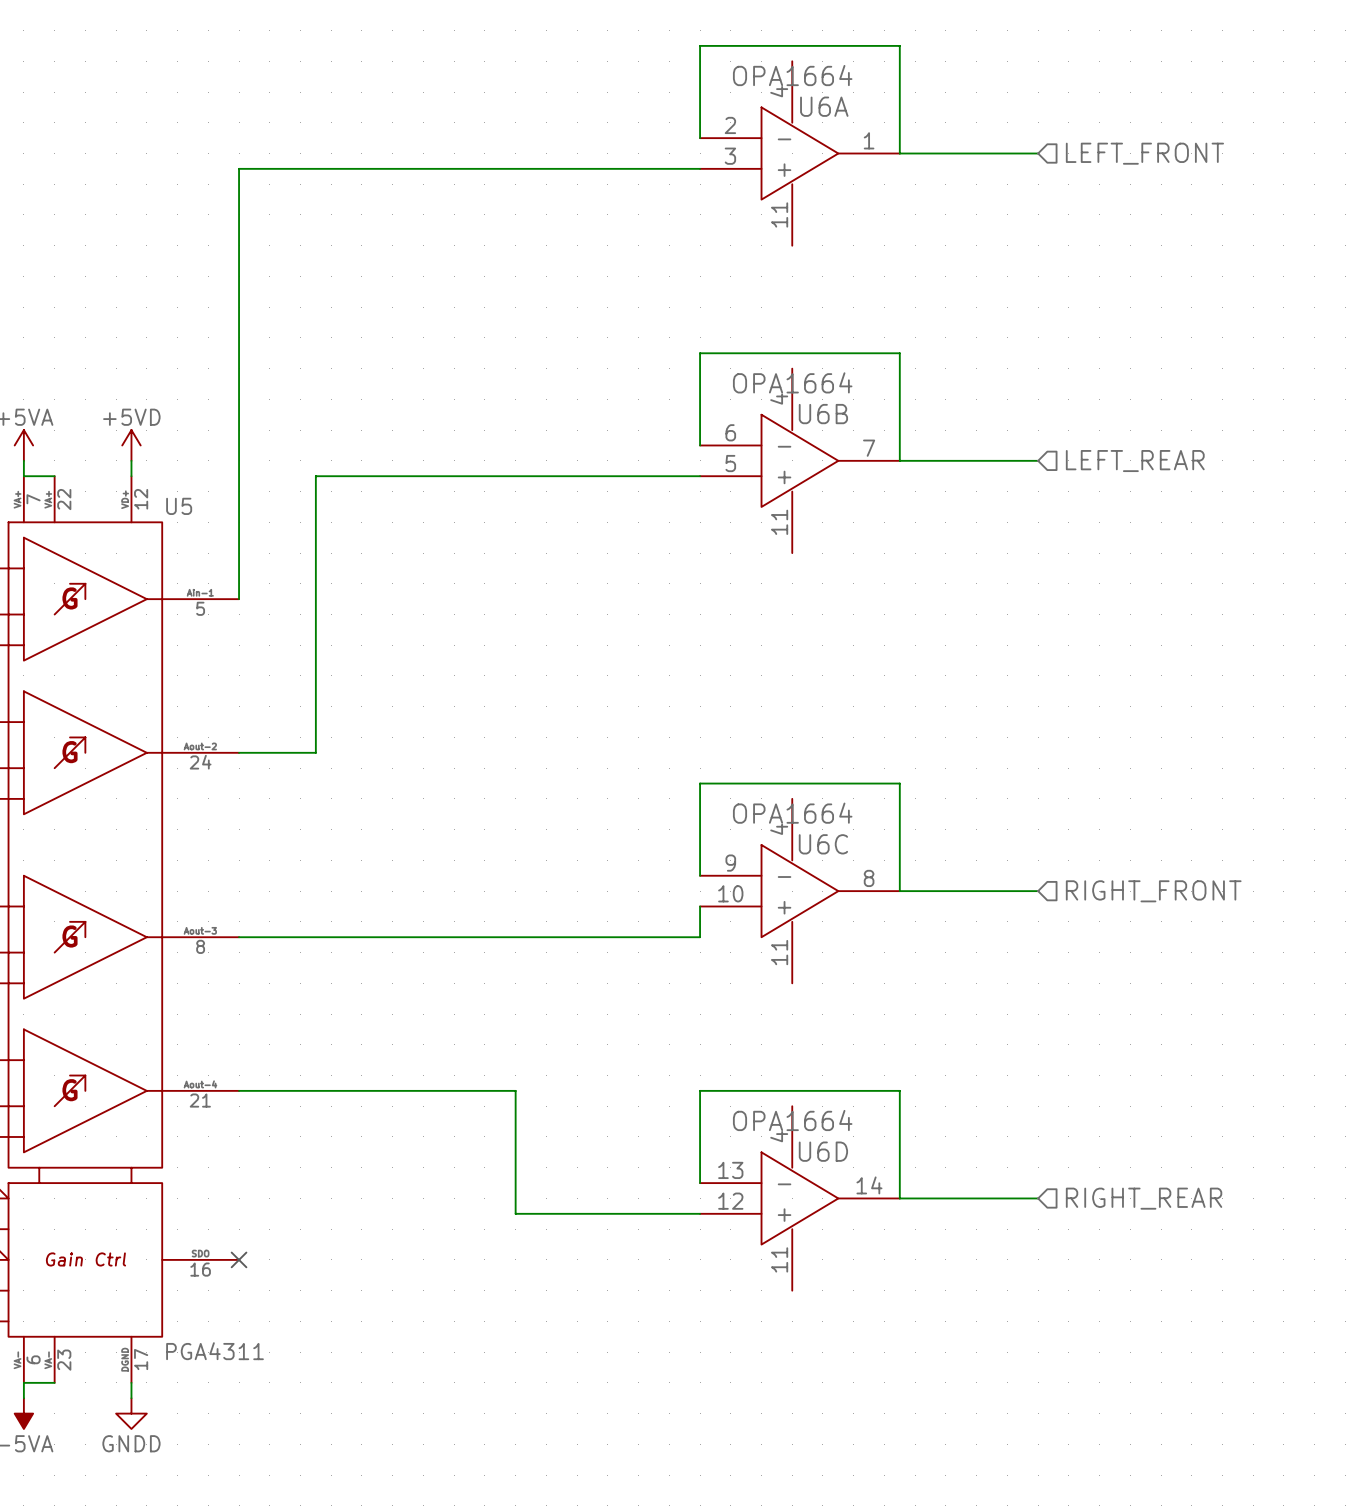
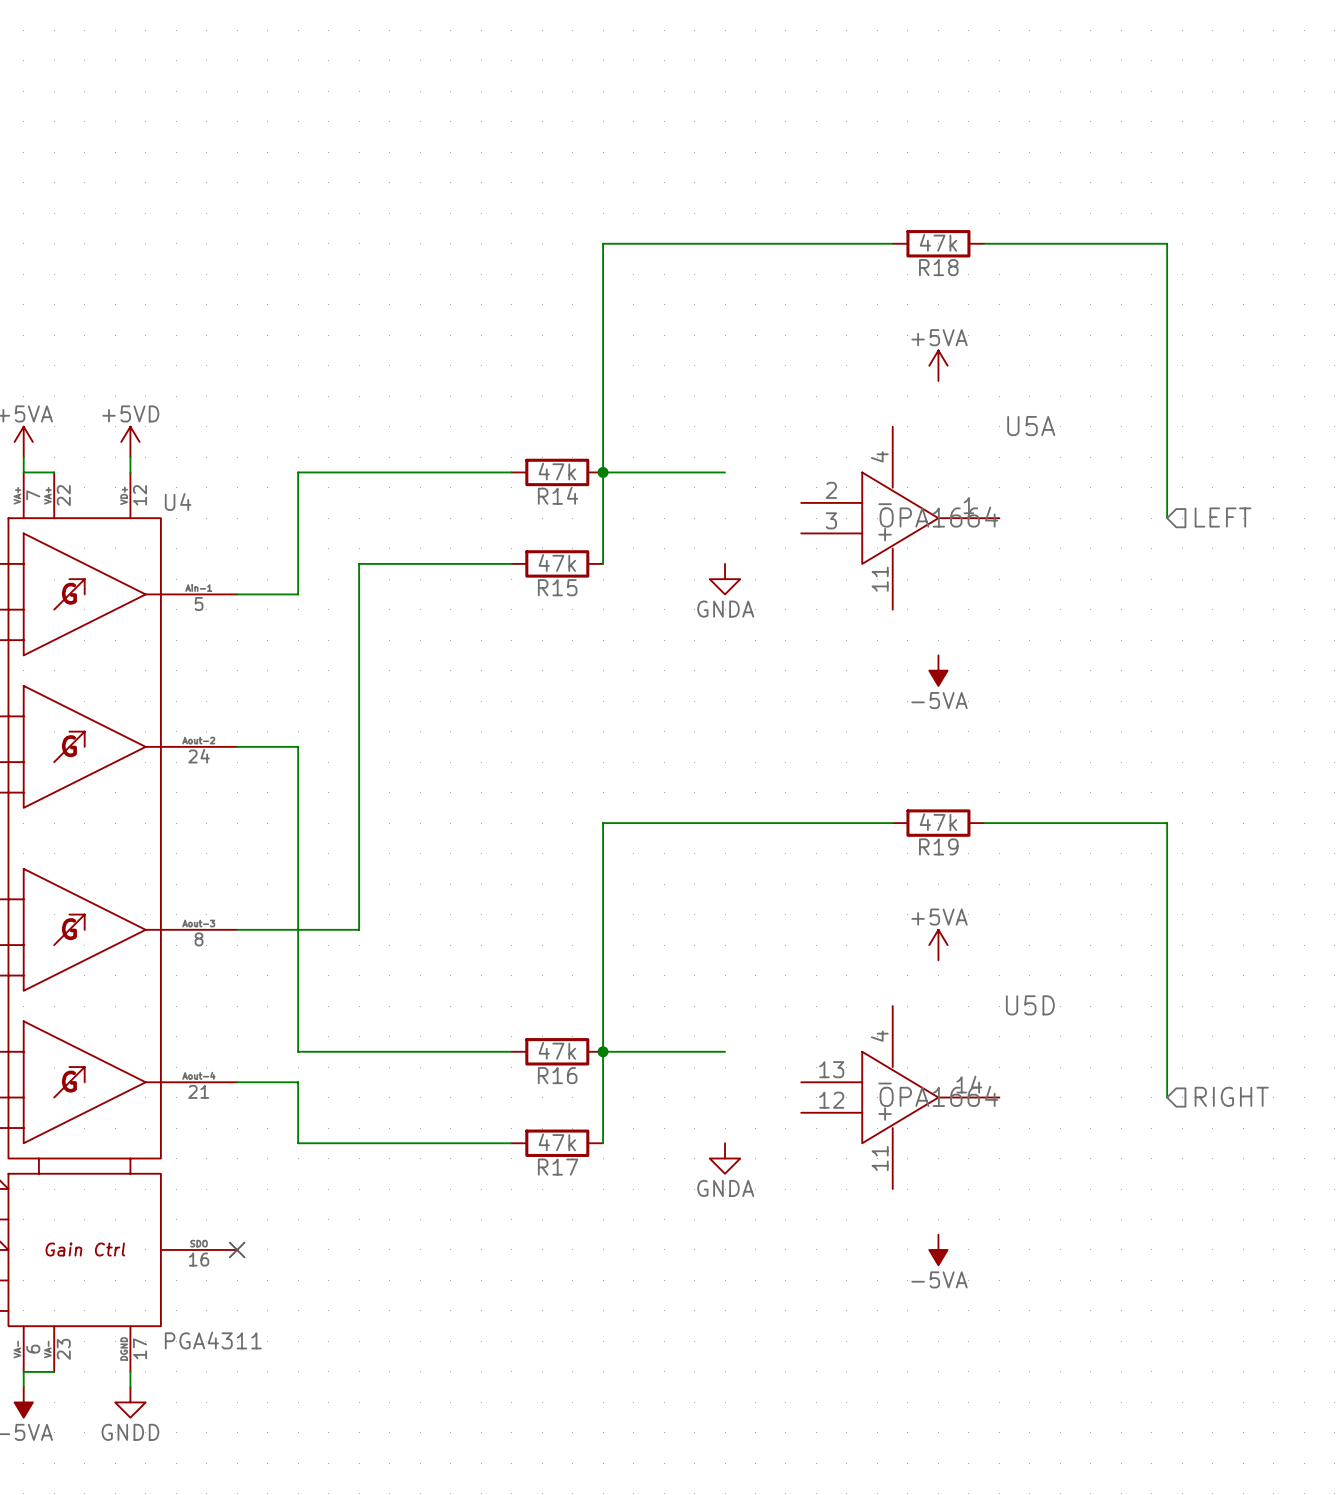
wire: (700, 138) (700, 45) (899, 45) (899, 153) (1038, 153) -> none
U6A: OPA1664 (799, 153) -> none
hierarchical label: LEFT_FRONT (1144, 153) -> none
wire: (700, 168) (239, 168) (239, 599) -> none
wire: none -> (892, 243) (603, 243) (603, 563)
R18: none -> 47k (938, 243)
wire: none -> (984, 243) (1167, 243) (1167, 518)
power symbol: none -> +5VA (938, 365)
wire: (700, 445) (700, 353) (899, 353) (899, 460) (1038, 460) -> none
U6B: OPA1664 (799, 460) -> none
hierarchical label: LEFT_REAR (1135, 461) -> none
wire: (315, 476) (315, 752) (300, 752) -> (313, 472) (298, 472) (298, 594) (237, 594)
wire: (515, 476) (607, 476) -> none
R14: none -> 47k (557, 472)
junction: none -> (603, 472)
U5 name: U5 (179, 506) -> U4 (178, 502)
hierarchical label: none -> LEFT (1223, 517)
U5A: none -> OPA1664 (900, 518)
R15: none -> 47k (557, 563)
power symbol: none -> GNDA (725, 579)
power symbol: none -> -5VA (938, 670)
wire: none -> (298, 746) (298, 1051) (511, 1051)
wire: none -> (892, 823) (603, 823) (603, 1143)
R19: none -> 47k (938, 823)
wire: none -> (984, 823) (1167, 823) (1167, 1097)
wire: (700, 875) (700, 783) (899, 783) (899, 891) (1038, 891) -> none
U6C: OPA1664 (799, 891) -> none
hierarchical label: RIGHT_FRONT (1153, 891) -> none
wire: (700, 906) (700, 937) (361, 937) -> (511, 563) (359, 563) (359, 929)
power symbol: none -> +5VA (938, 945)
R16: none -> 47k (557, 1051)
wire: none -> (603, 1051) (725, 1051)
junction: none -> (603, 1051)
wire: (300, 1090) (515, 1090) (515, 1213) (700, 1213) -> (298, 1082) (298, 1143) (511, 1143)
hierarchical label: none -> RIGHT (1231, 1096)
U5D: none -> OPA1664 (900, 1097)
R17: none -> 47k (557, 1143)
power symbol: none -> GNDA (725, 1158)
wire: (700, 1183) (700, 1090) (899, 1090) (899, 1198) (1038, 1198) -> none
U6D: OPA1664 (799, 1198) -> none
hierarchical label: RIGHT_REAR (1144, 1198) -> none
power symbol: none -> -5VA (938, 1249)

